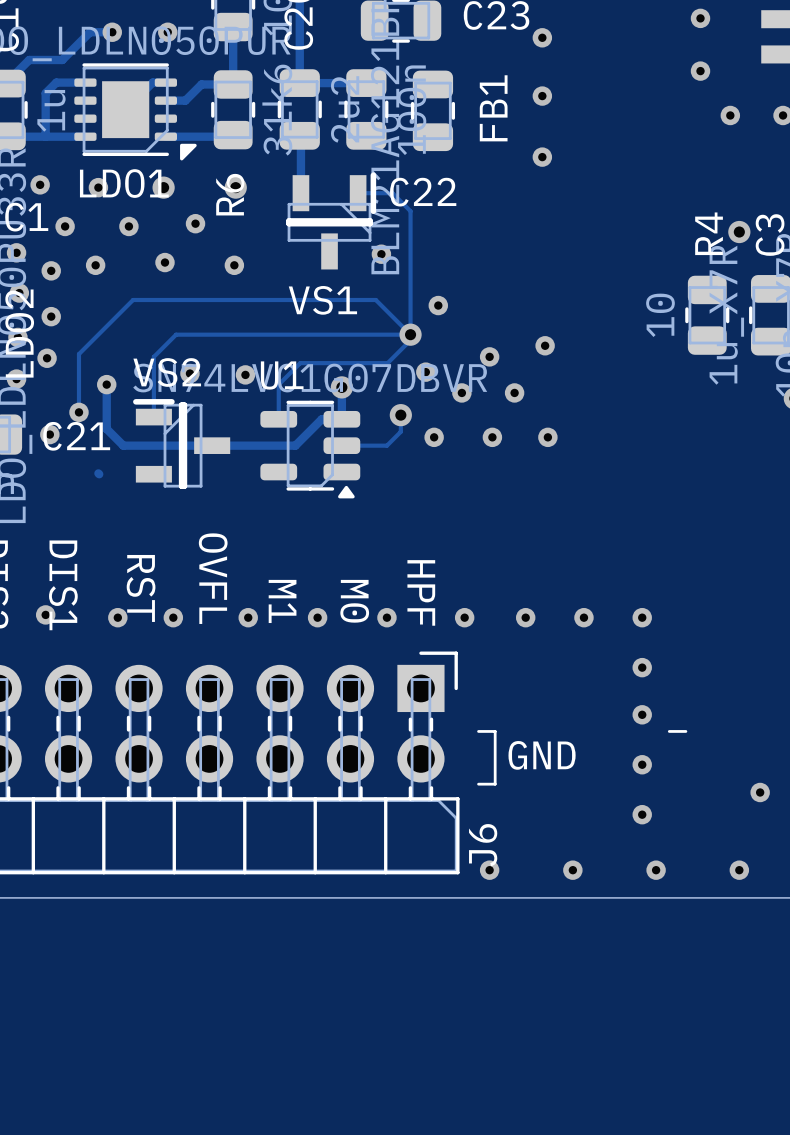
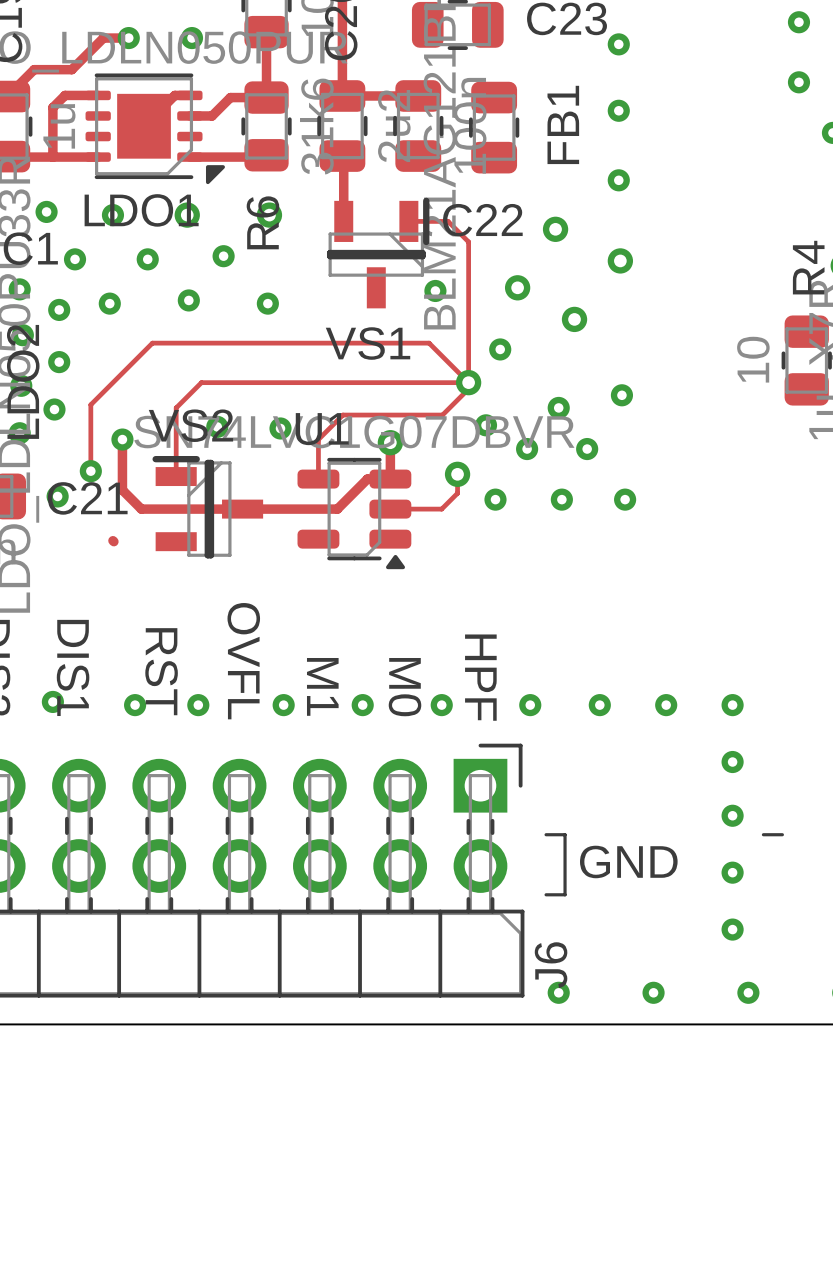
via: none -> (555, 229)
via: none -> (620, 260)
via: none -> (517, 287)
via: none -> (574, 319)

